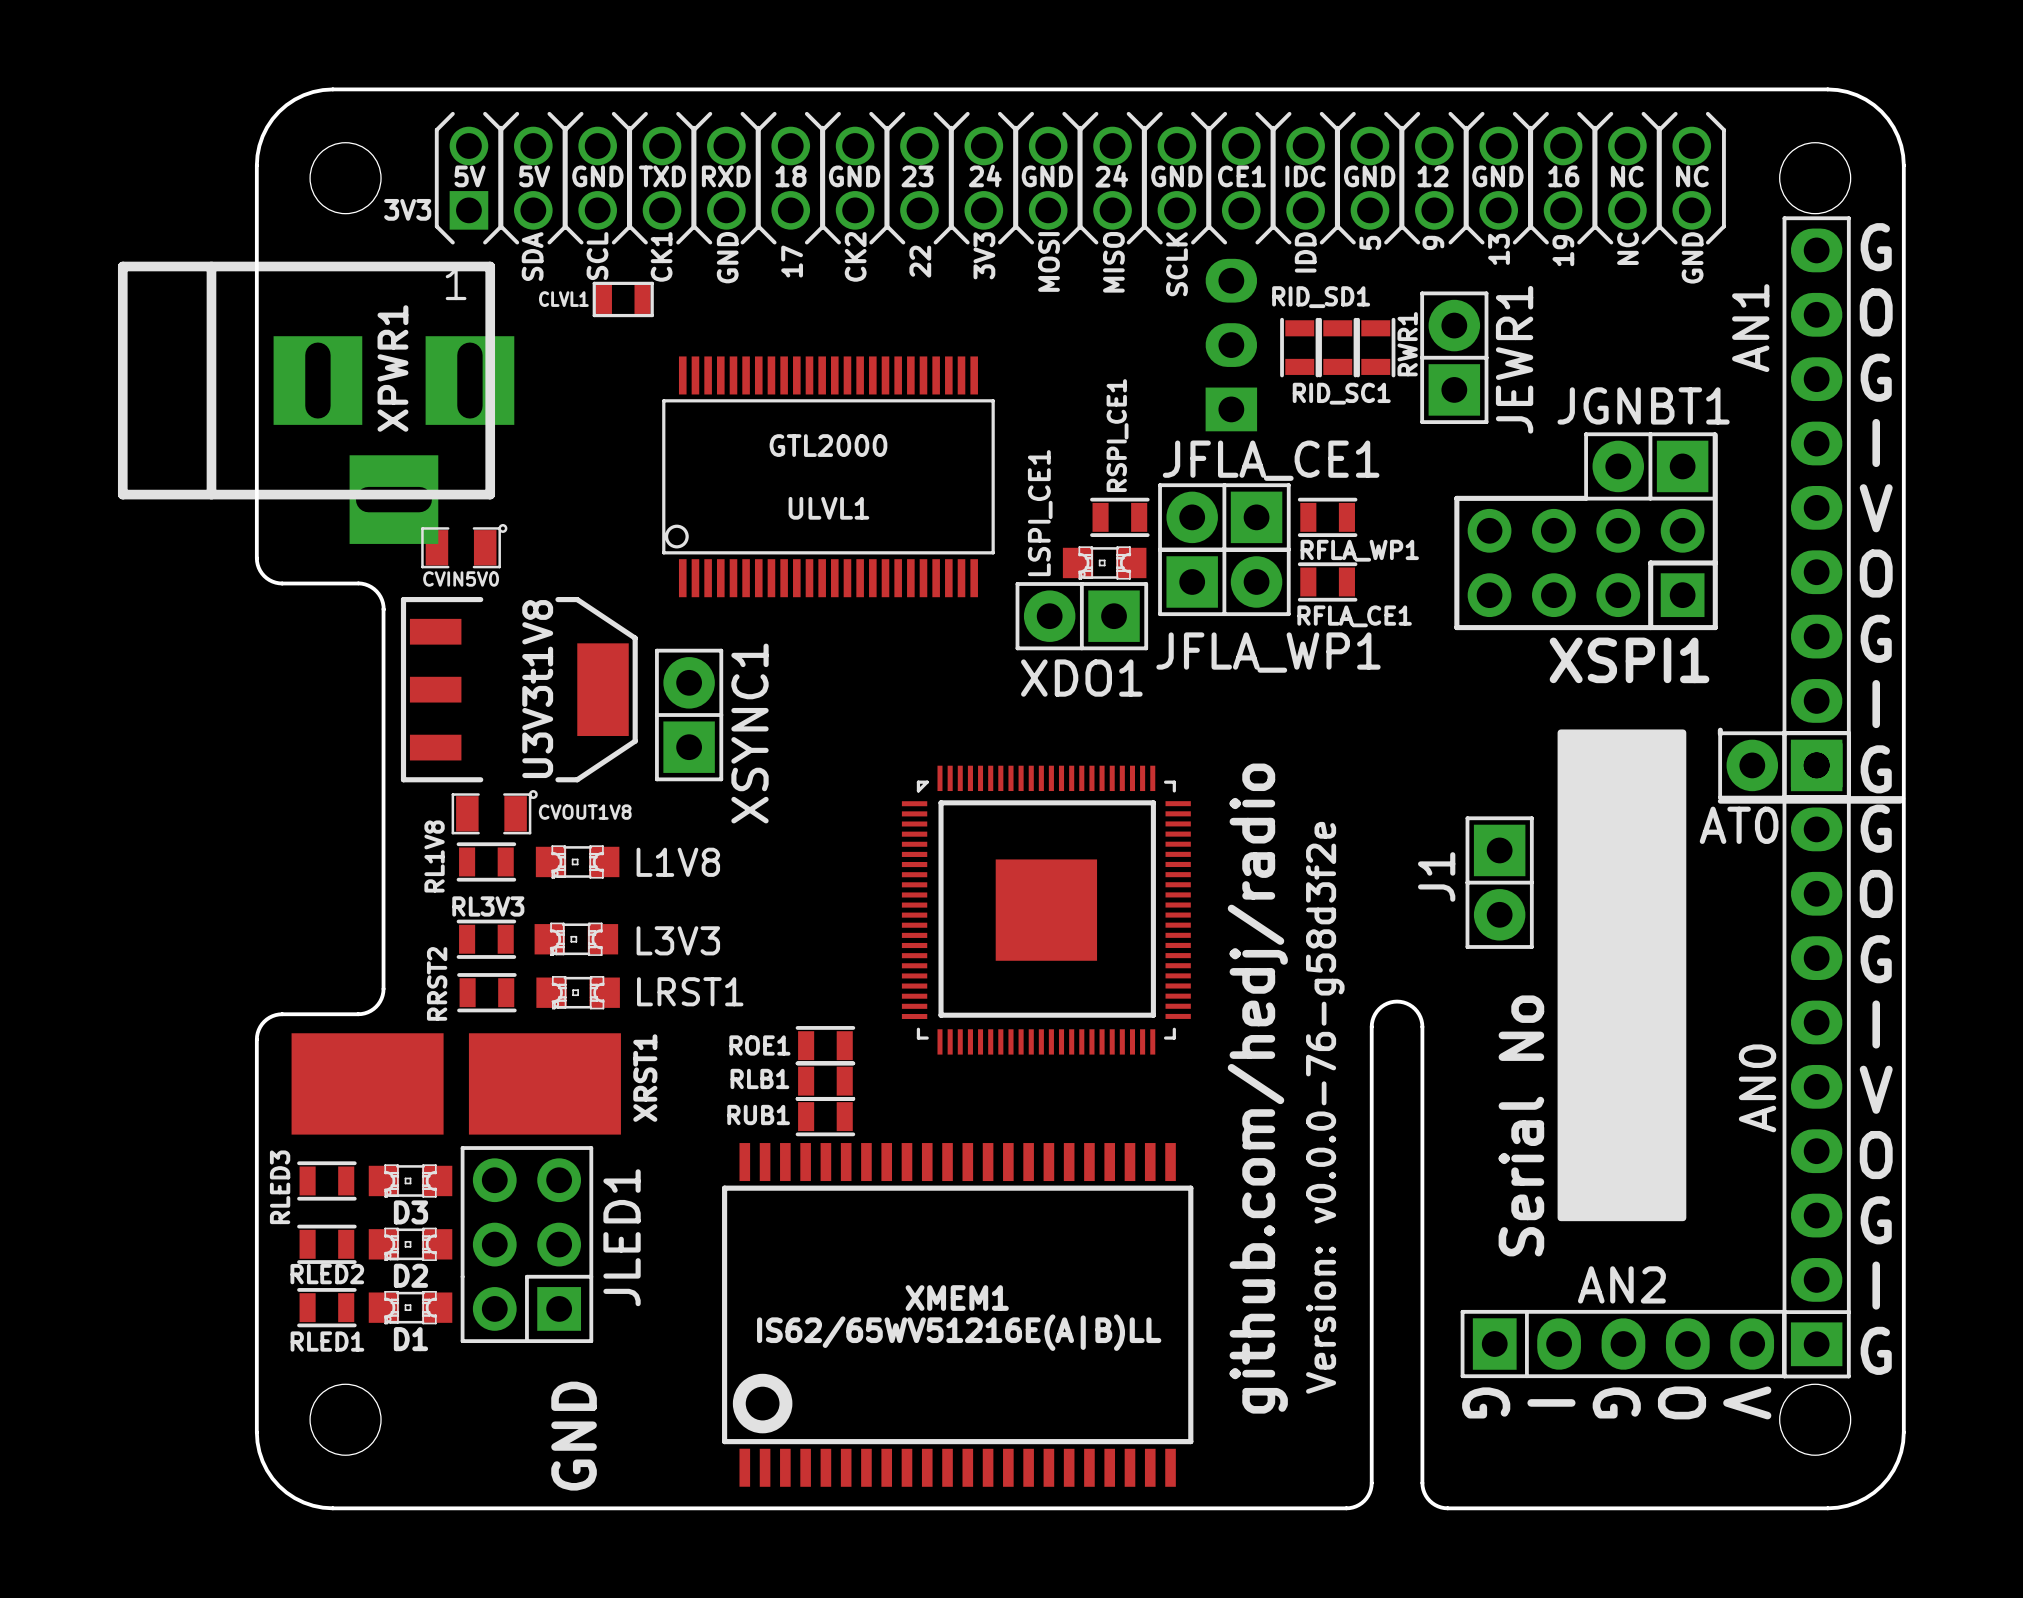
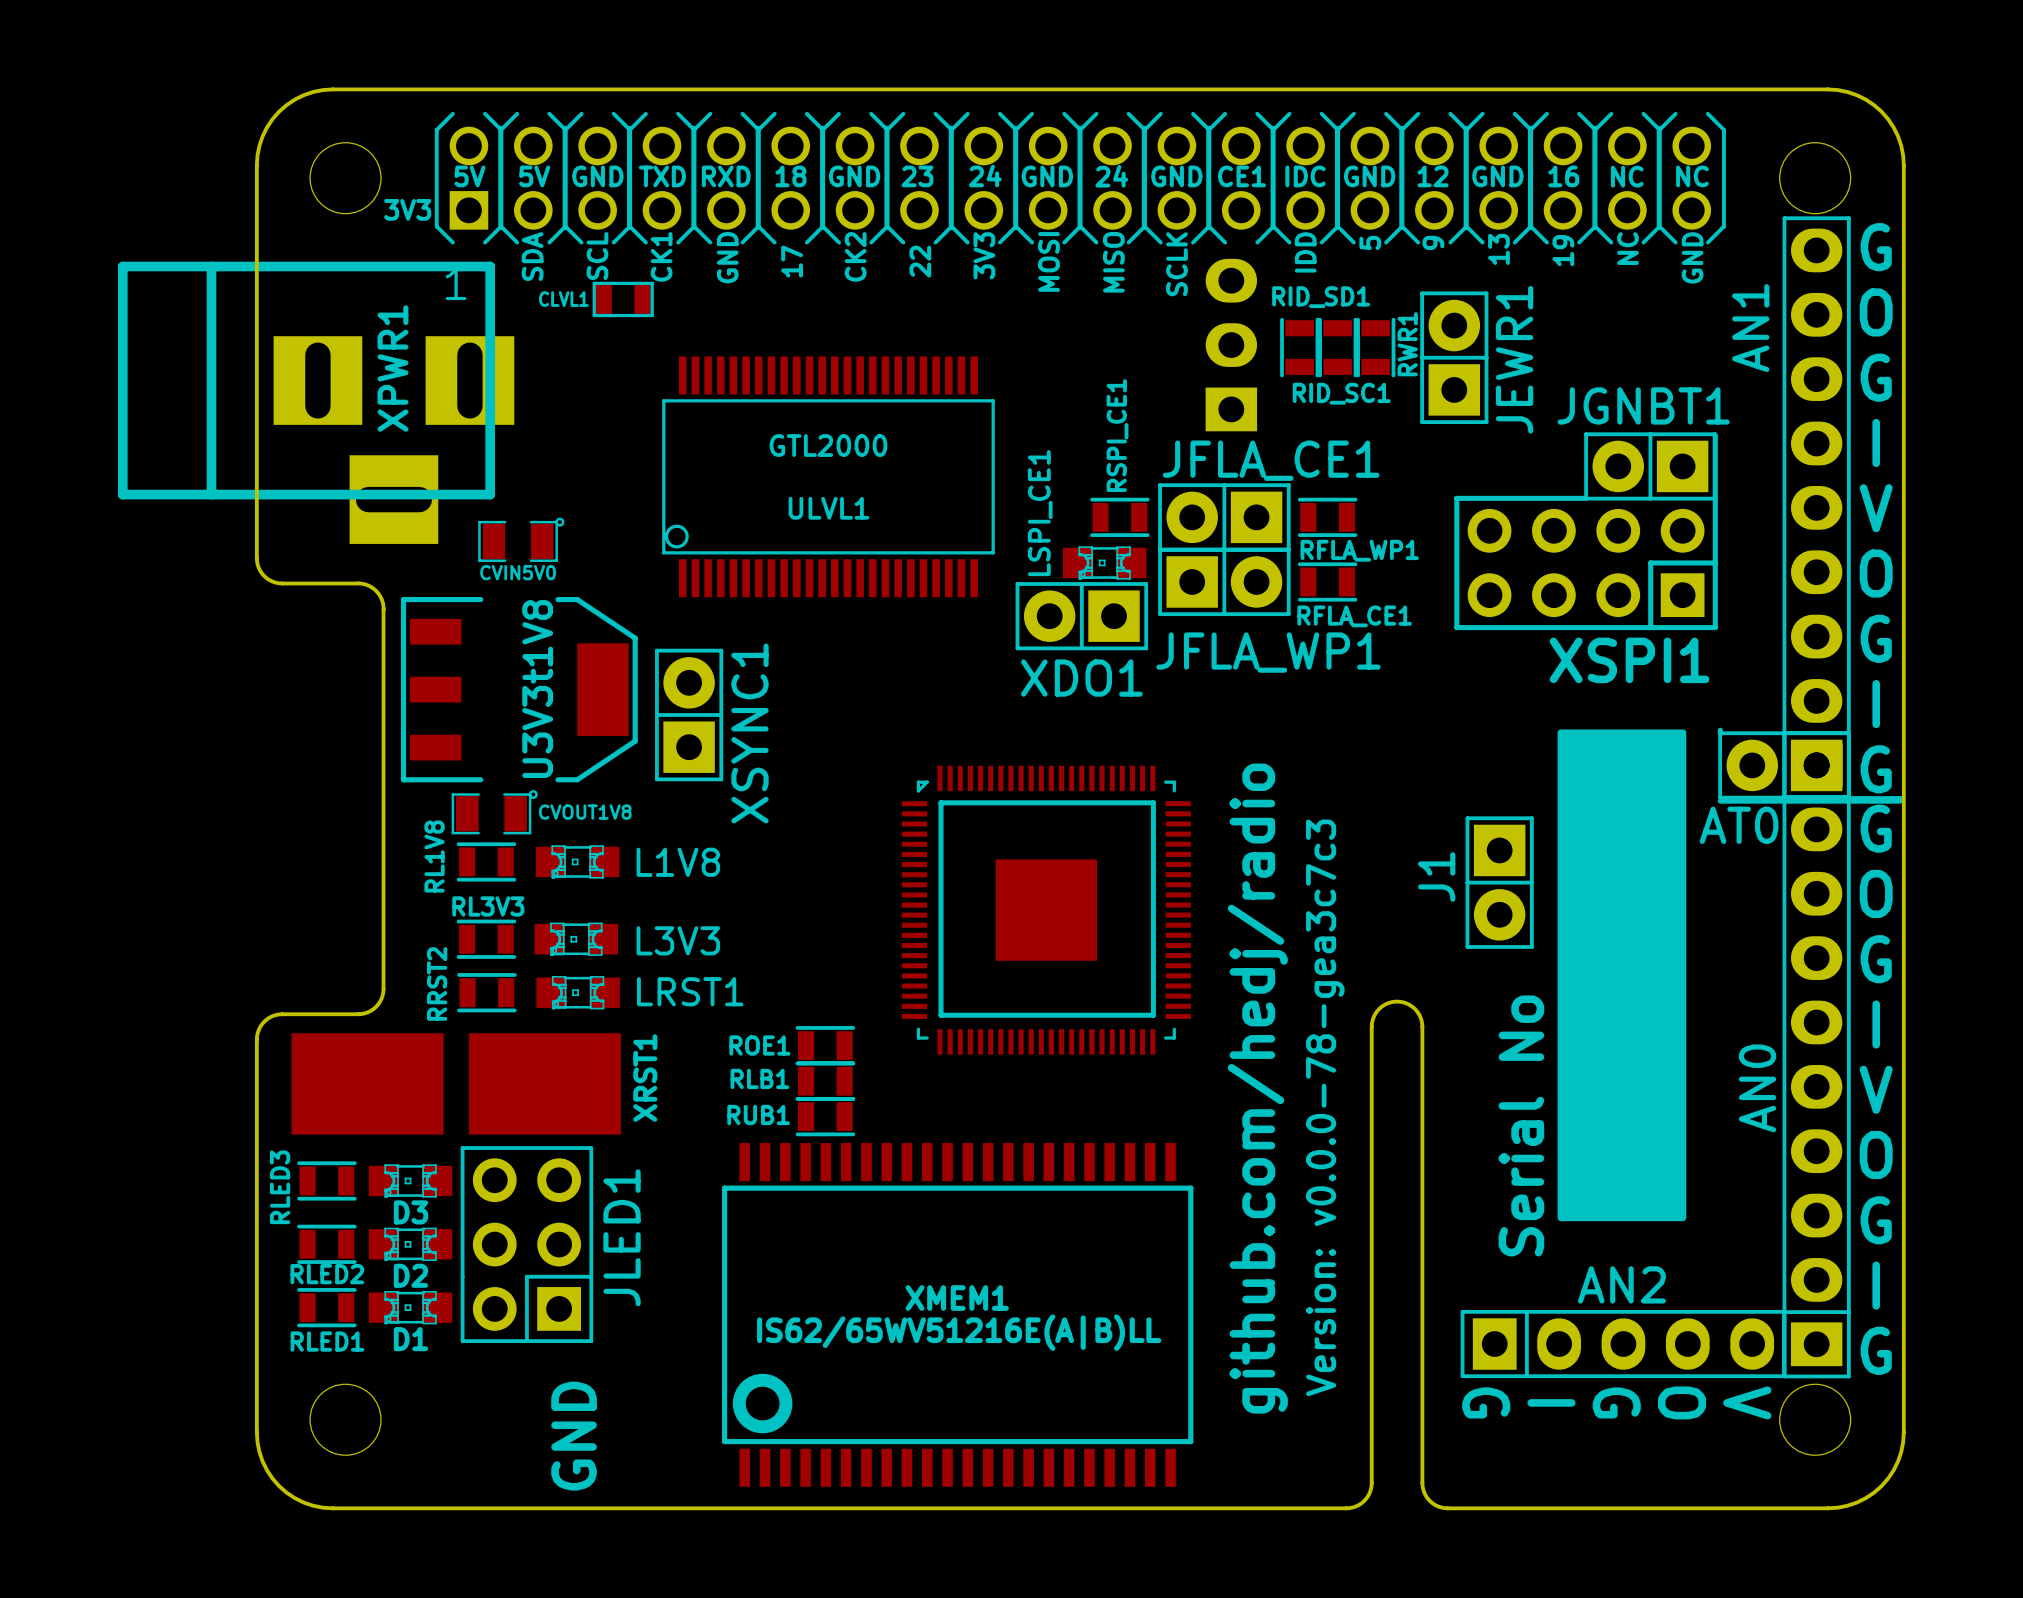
CVIN5V0 position: (464, 546) -> (521, 539)
text: Version: v0.0.0-76-g58d3f2e (1325, 1107) -> Version: v0.0.0-78-gea3c7c3 (1325, 1107)

